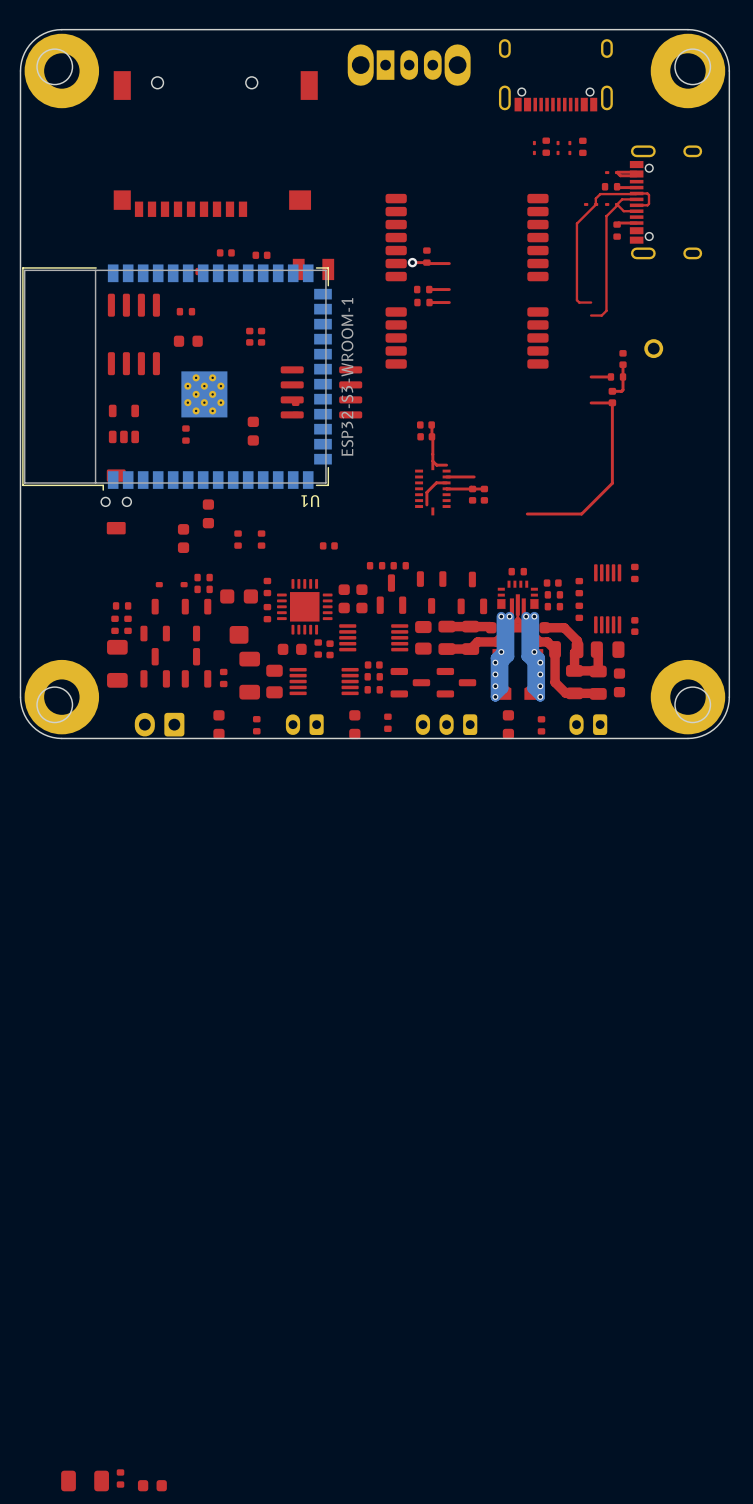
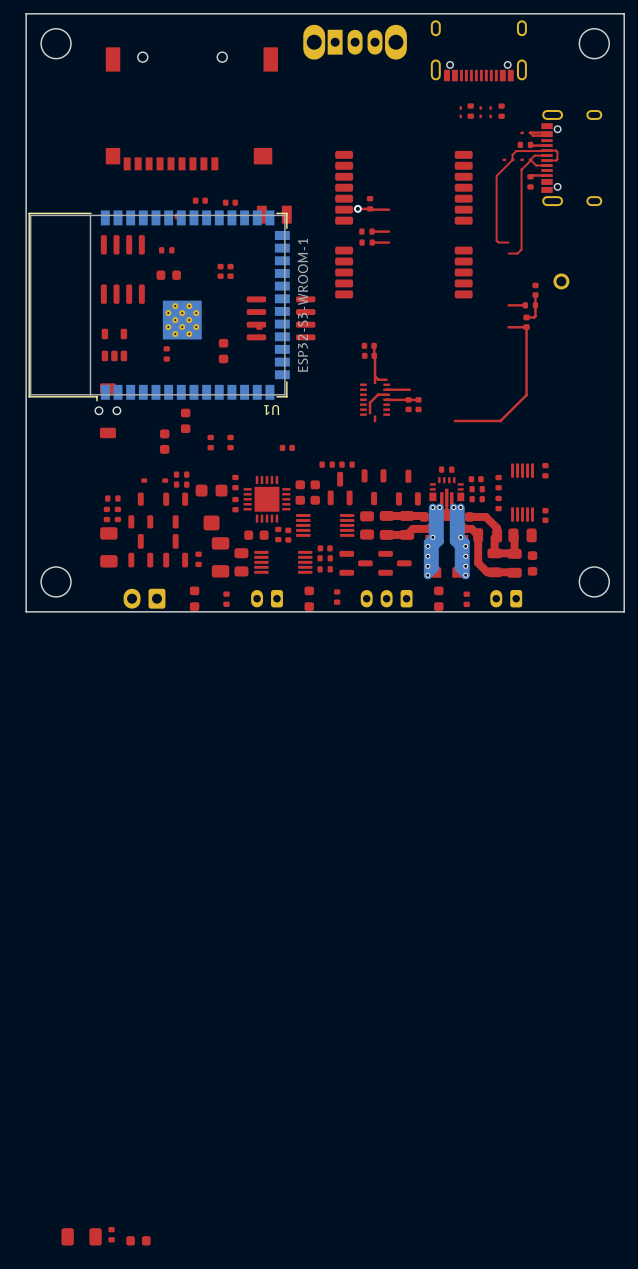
board edge: none -> (624, 13) (26, 13) (26, 611) (624, 611) (624, 13)
part: (374, 384) -> none

